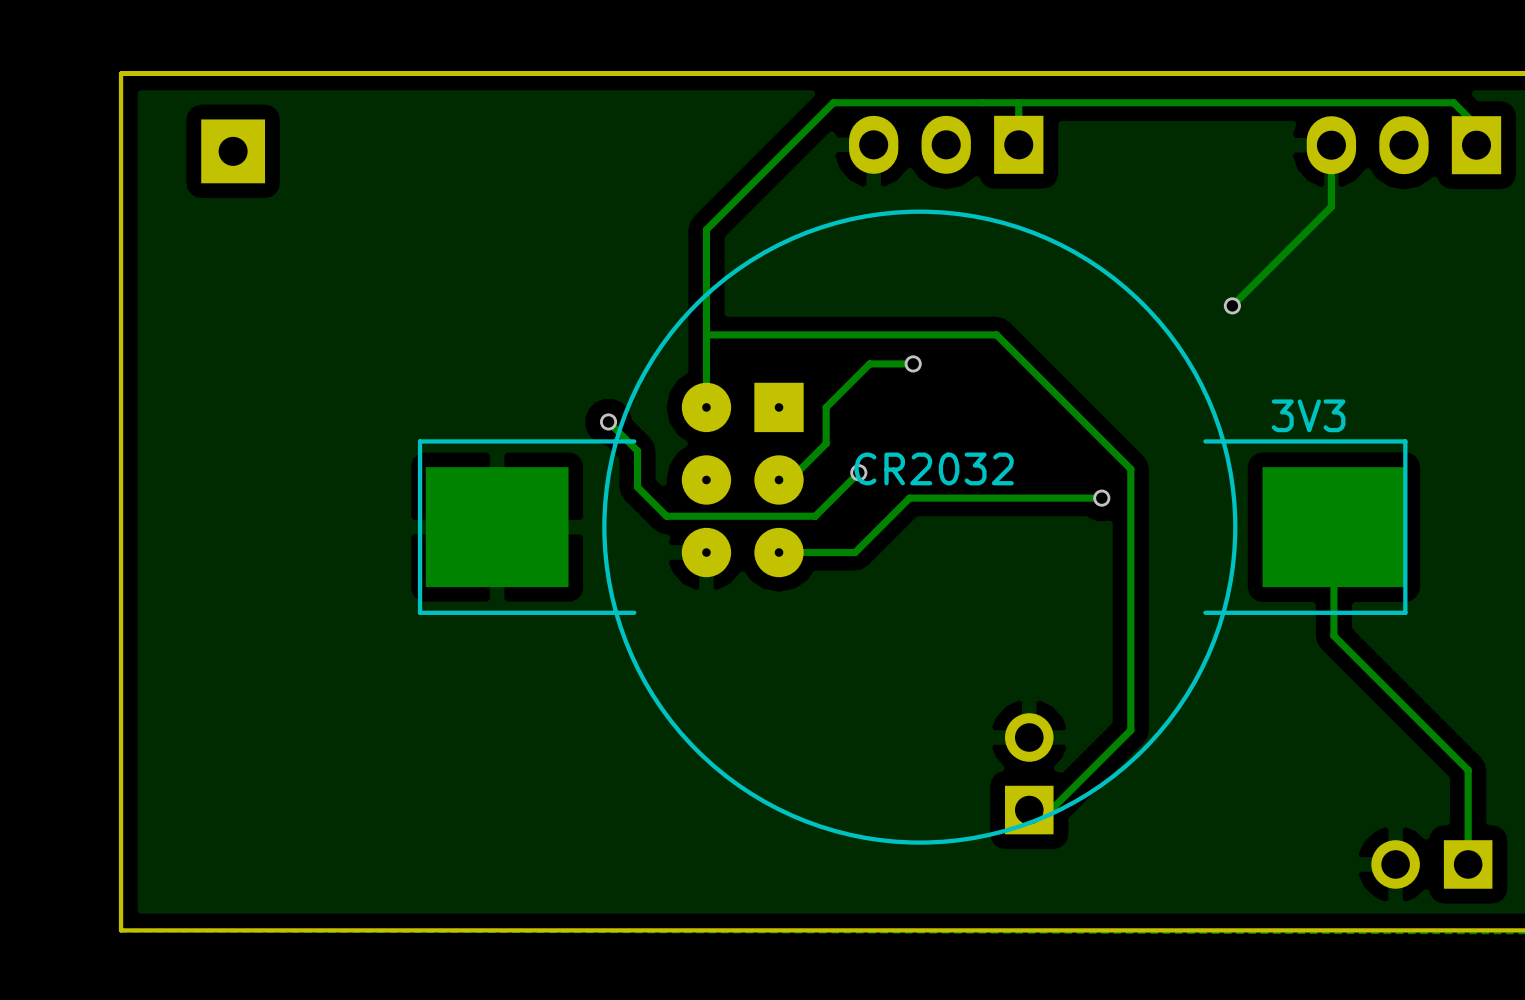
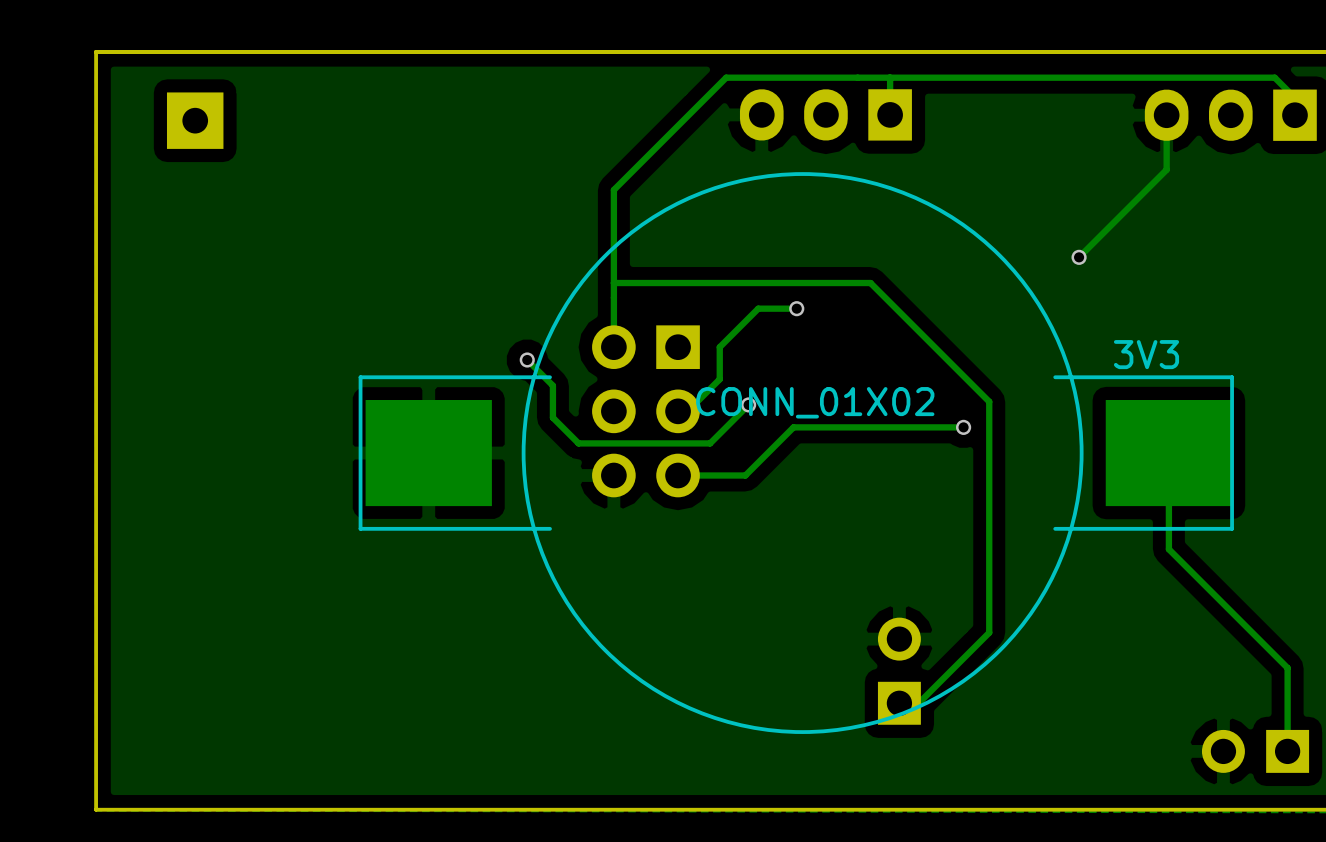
part footprint: [681, 382, 804, 578] -> [592, 325, 700, 498]
3V3 value: CR2032 (934, 468) -> CONN_01X02 (815, 402)

